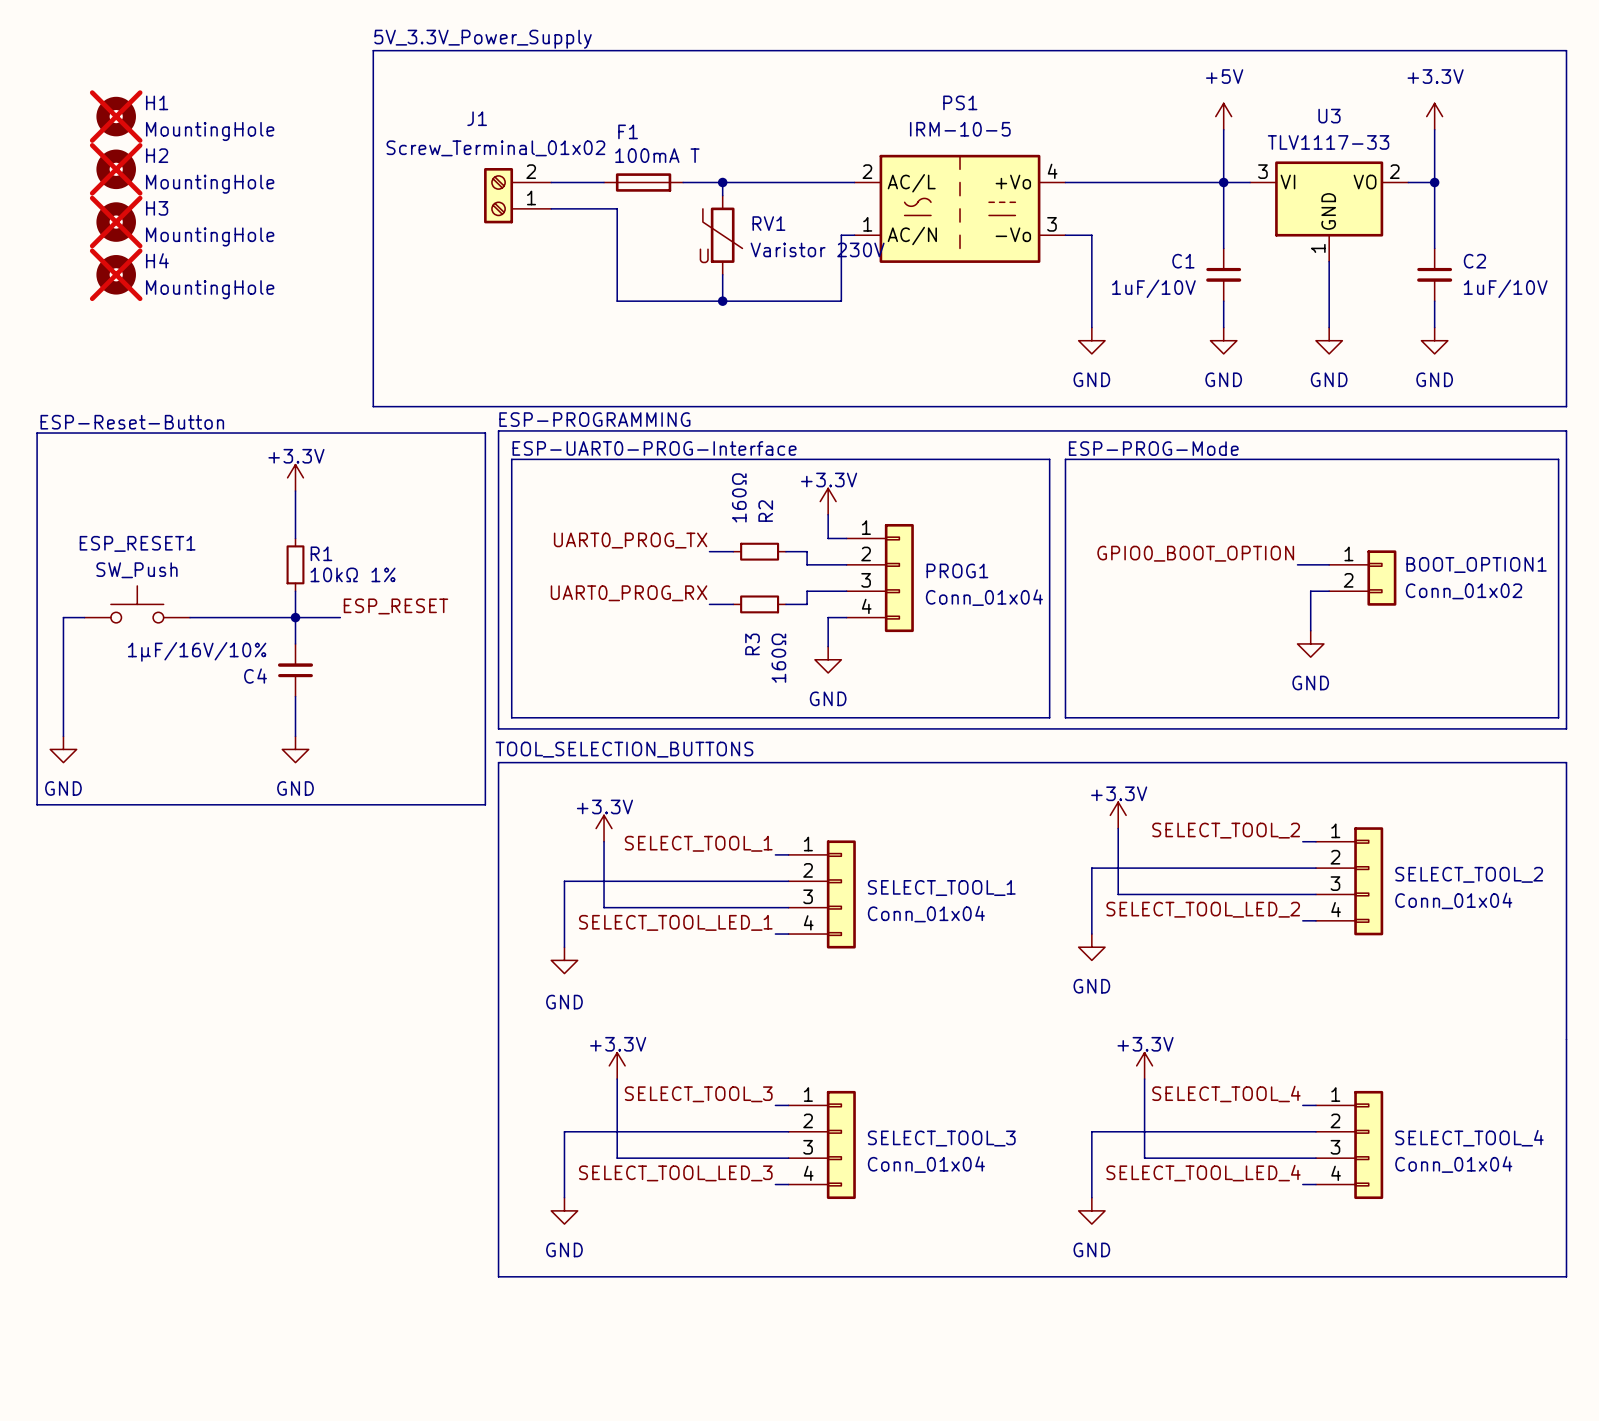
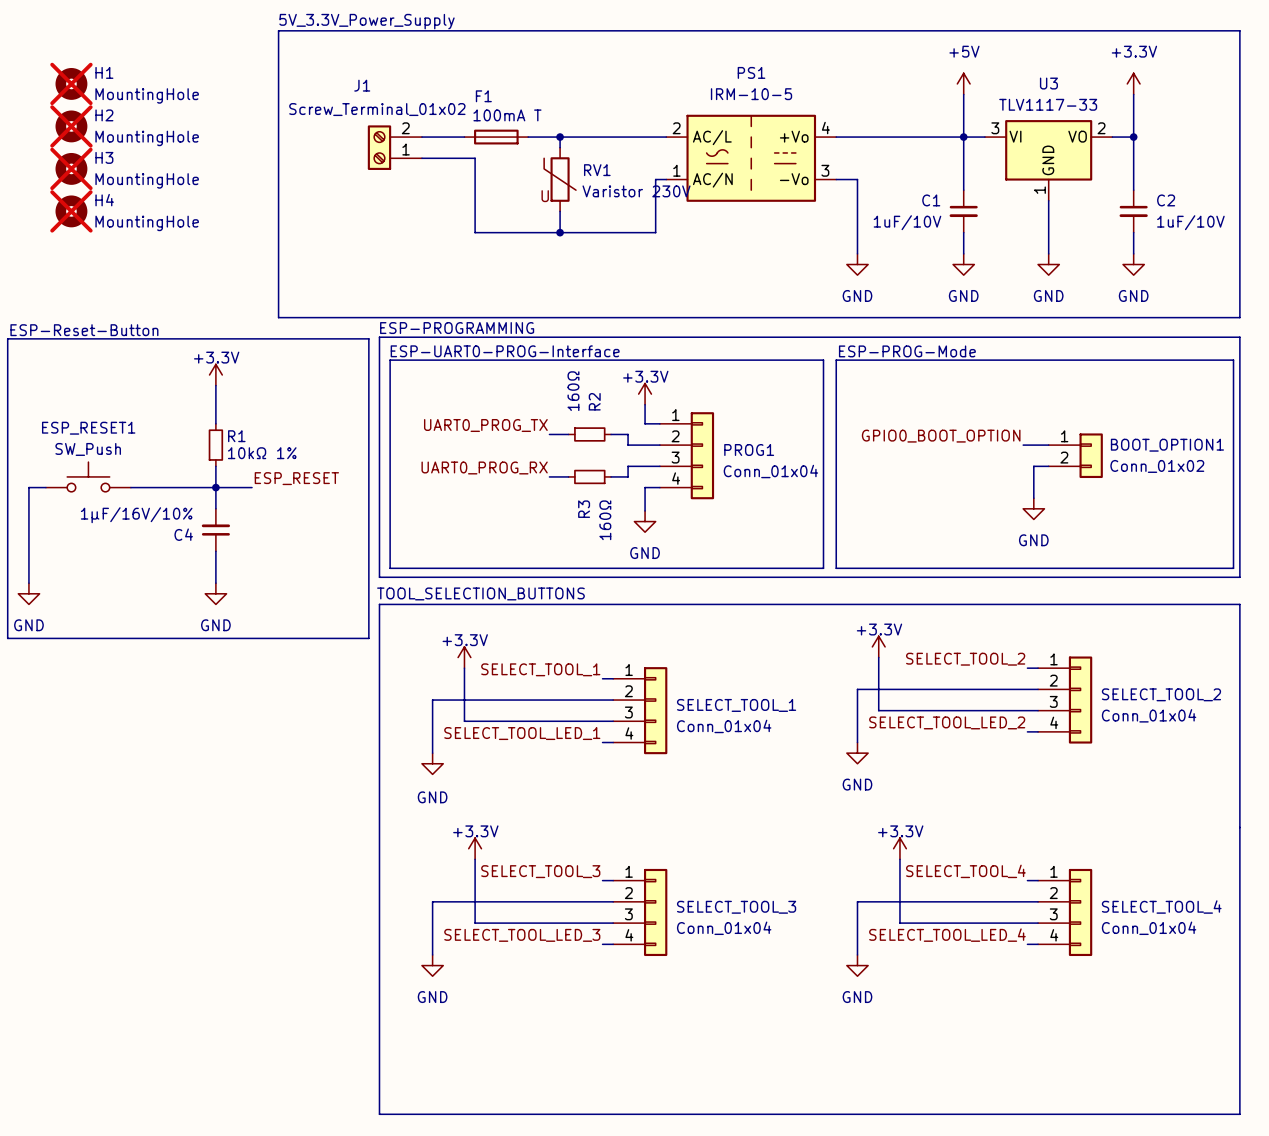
line: (498, 1276) (1566, 1276) -> (379, 1018) (379, 1114) (1239, 1114) (1239, 1018)

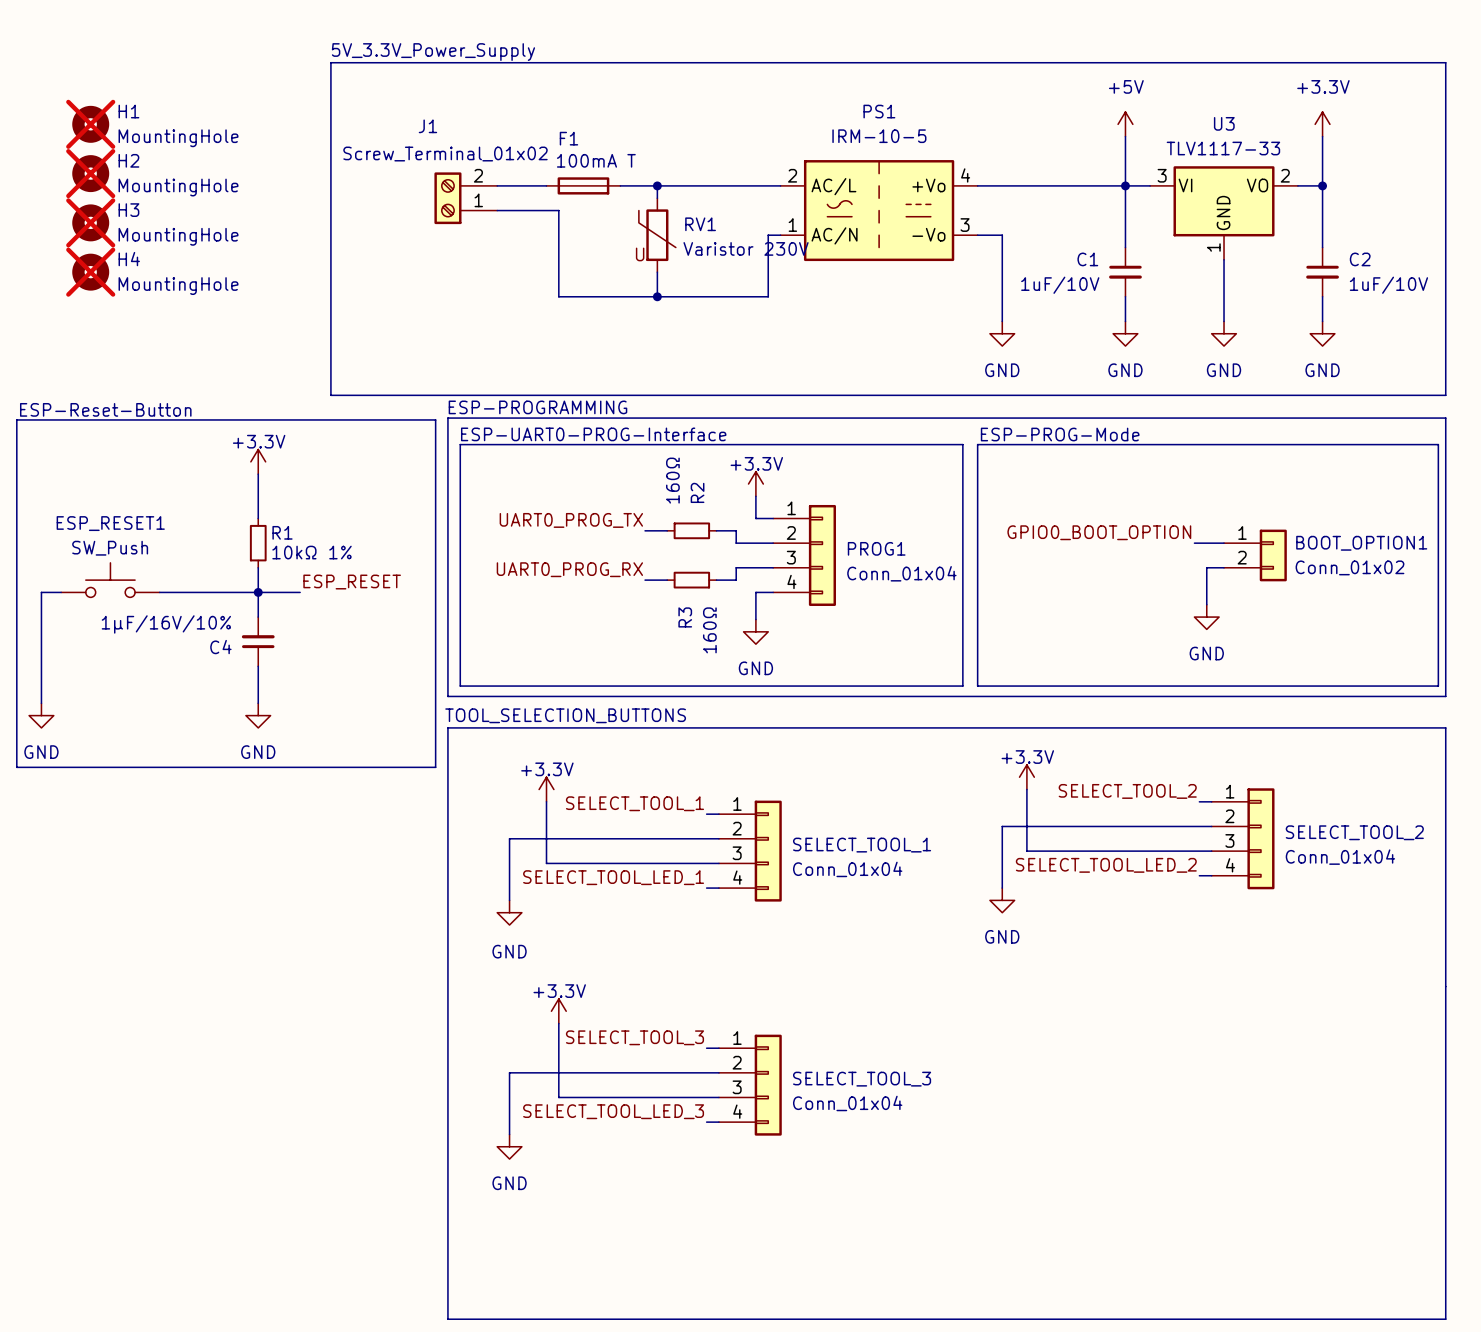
power symbol: +3.3V (899, 848) -> none
wire: (899, 859) (899, 923) (1038, 923) -> none
label: SELECT_TOOL_4 (965, 871) -> none
wire: (1027, 880) (1038, 880) -> none
wire: (1038, 901) (857, 901) (857, 954) -> none
SELECT_TOOL_4: Conn_01x04 (1065, 912) -> none
label: SELECT_TOOL_LED_4 (947, 935) -> none
wire: (1027, 944) (1038, 944) -> none
power symbol: GND (857, 965) -> none

